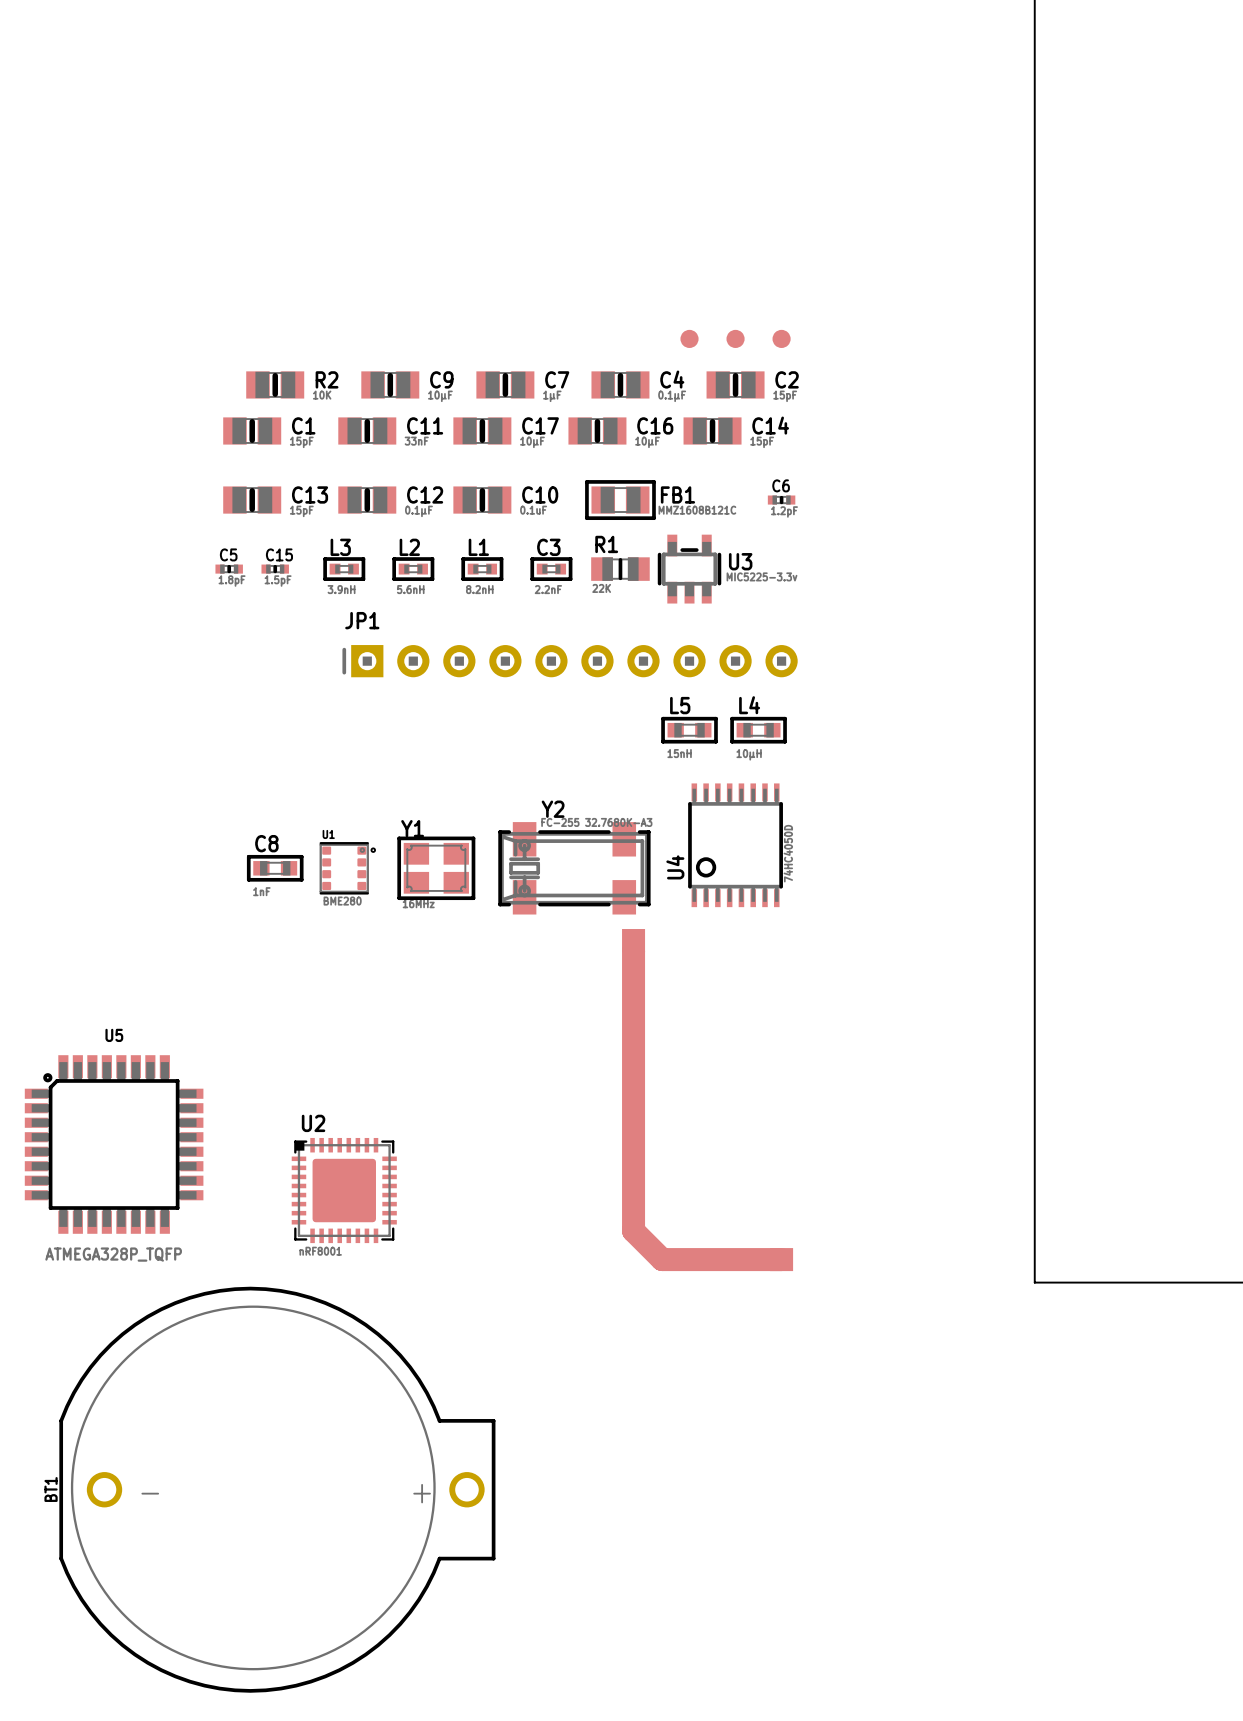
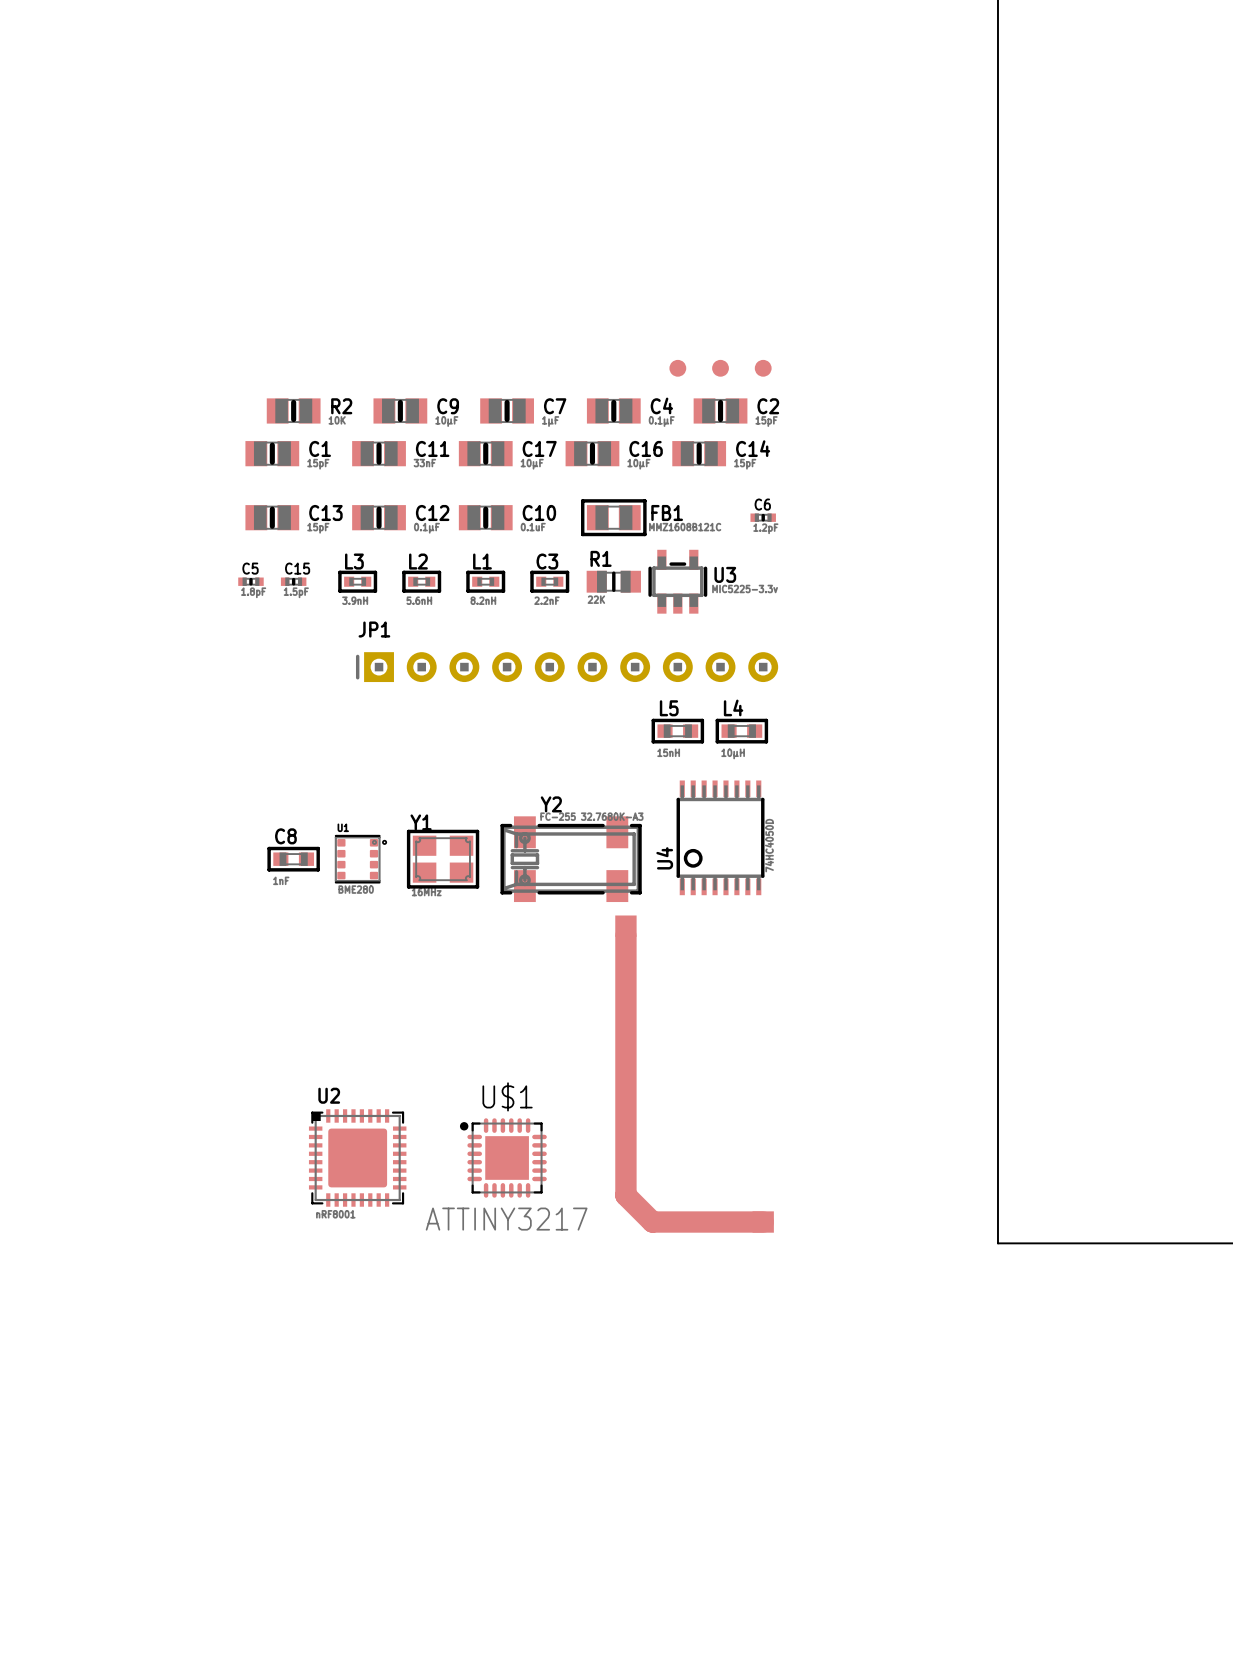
U5: ATMEGA328P_TQFP (114, 1144) -> none
U$1: none -> ATTINY3217 (503, 1157)
BT1: (277, 1489) -> none

